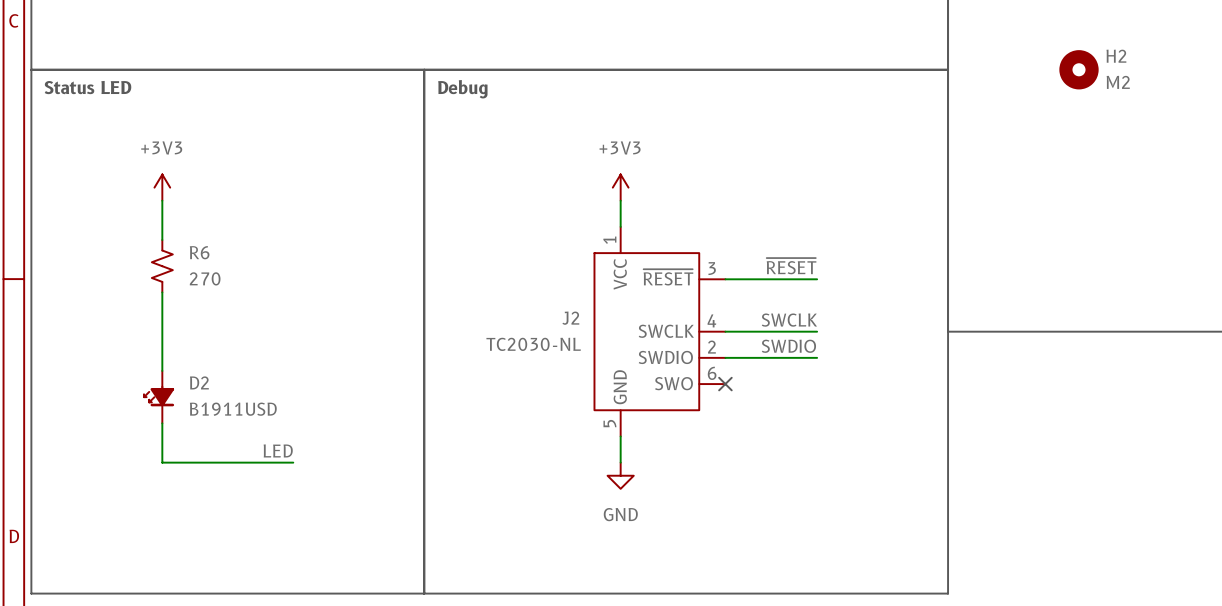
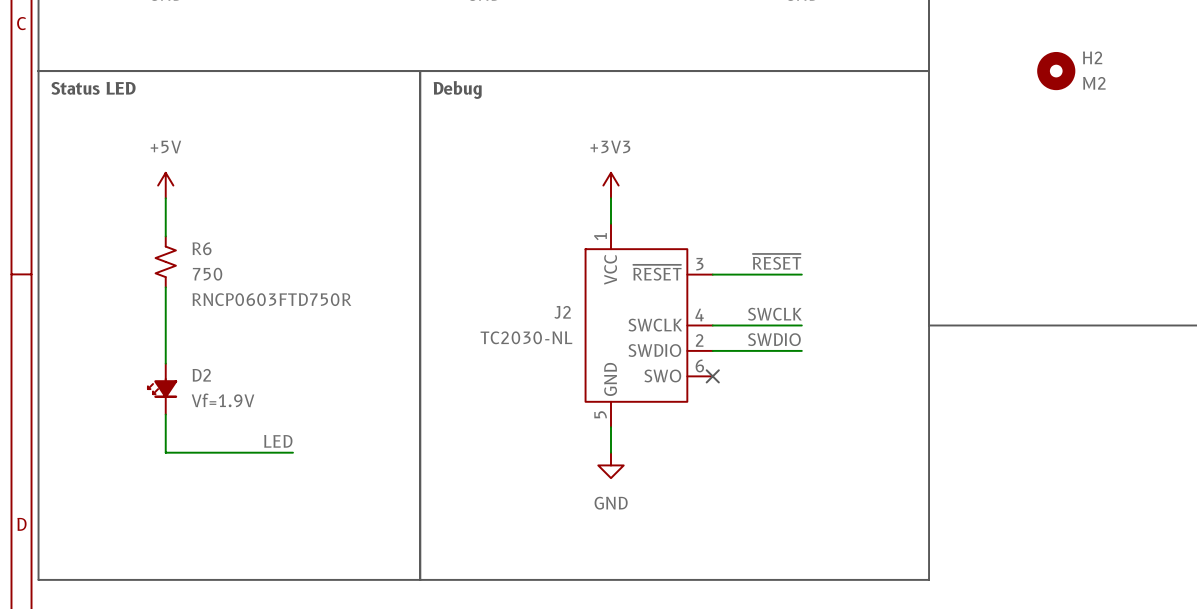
power symbol: +3V3 (162, 187) -> +5V (165, 185)
R6 value: 270 (205, 278) -> 750 (207, 274)
R6 text: none -> RNCP0603FTD750R (271, 299)
D2 value: B1911USD (233, 409) -> Vf=1.9V (223, 400)

